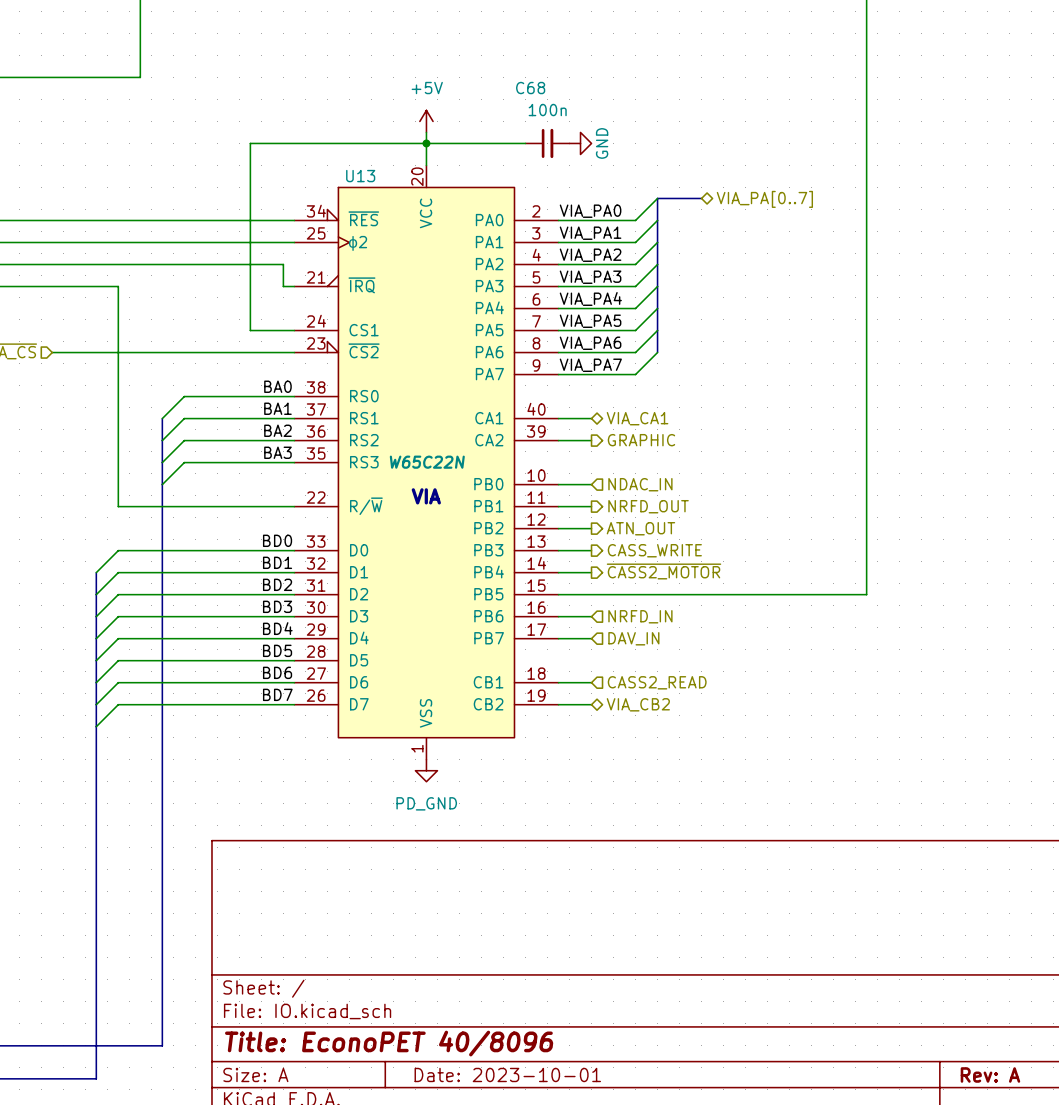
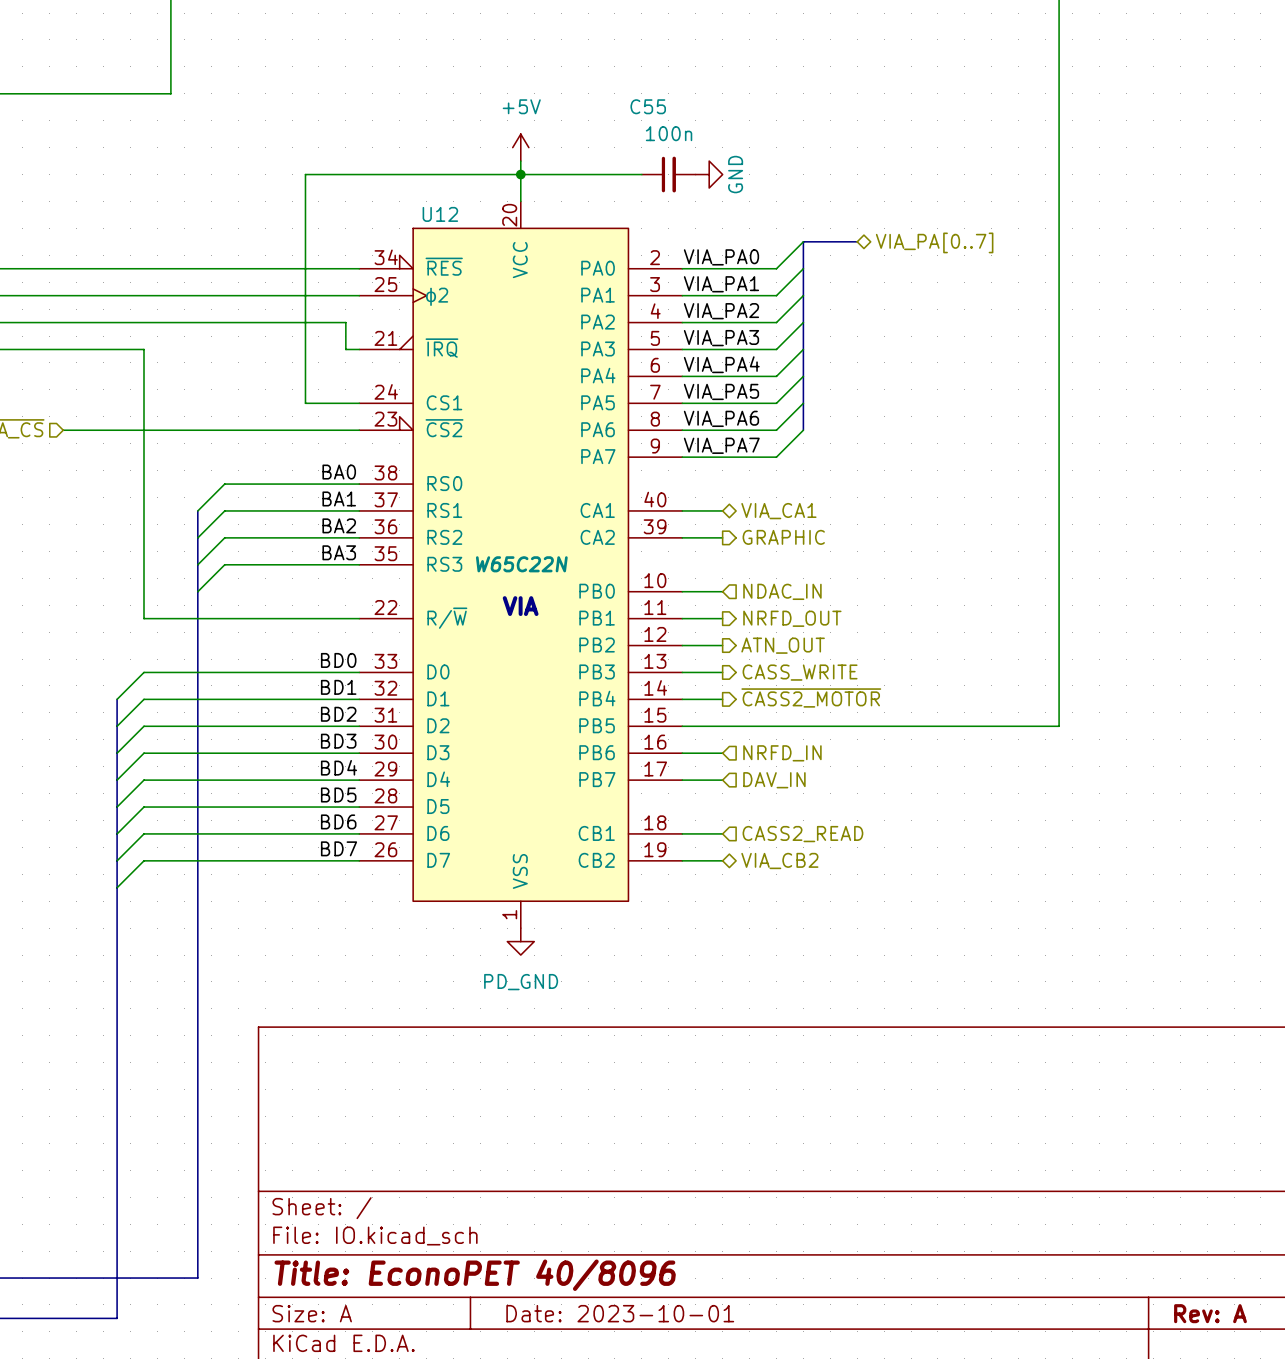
C68 name: C68 (530, 88) -> C55 (648, 106)
U13 name: U13 (360, 176) -> U12 (440, 214)

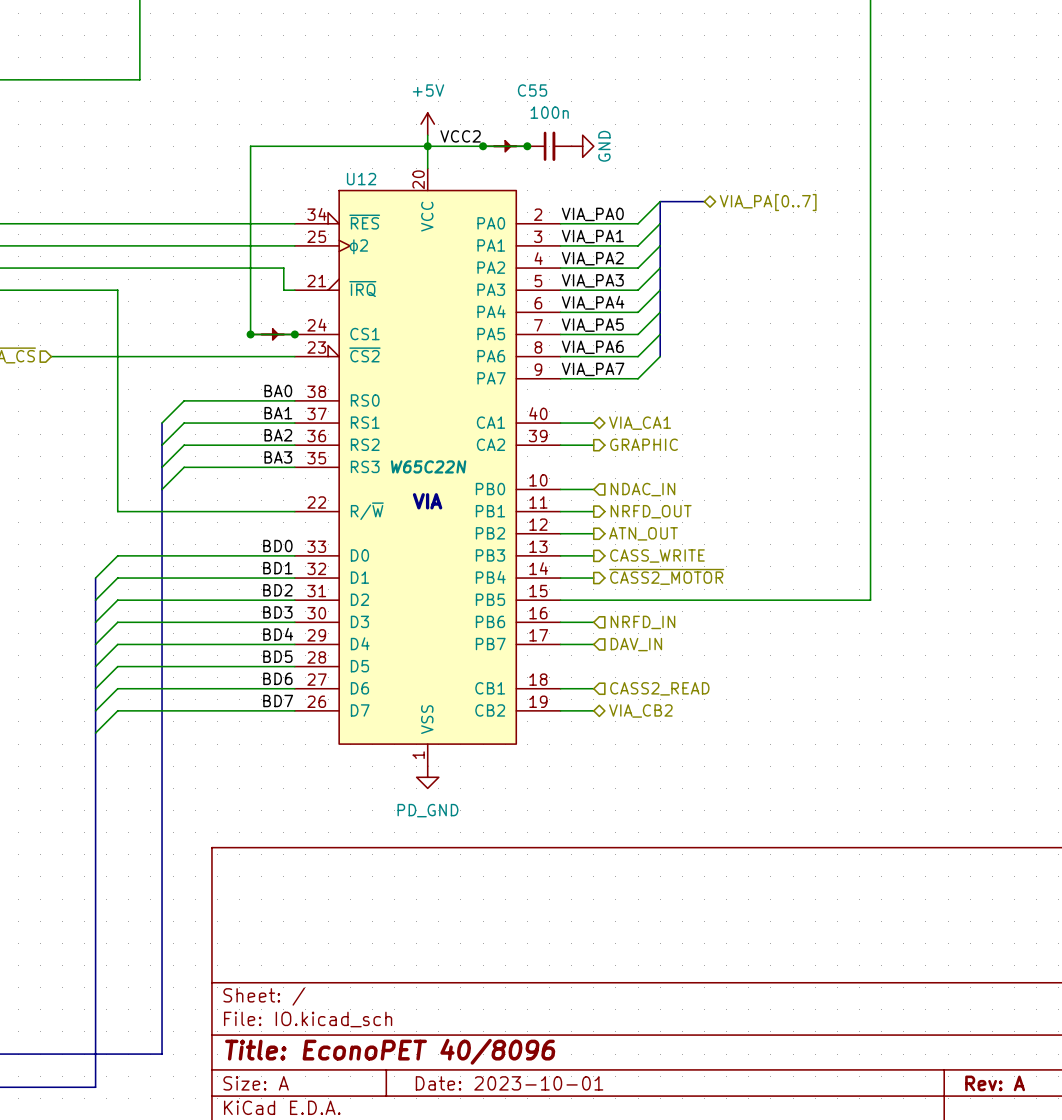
label: none -> VCC2 (460, 136)
junction: none -> (483, 146)
part: none -> (505, 146)
junction: none -> (527, 146)
junction: none -> (250, 334)
part: none -> (272, 334)
junction: none -> (294, 334)

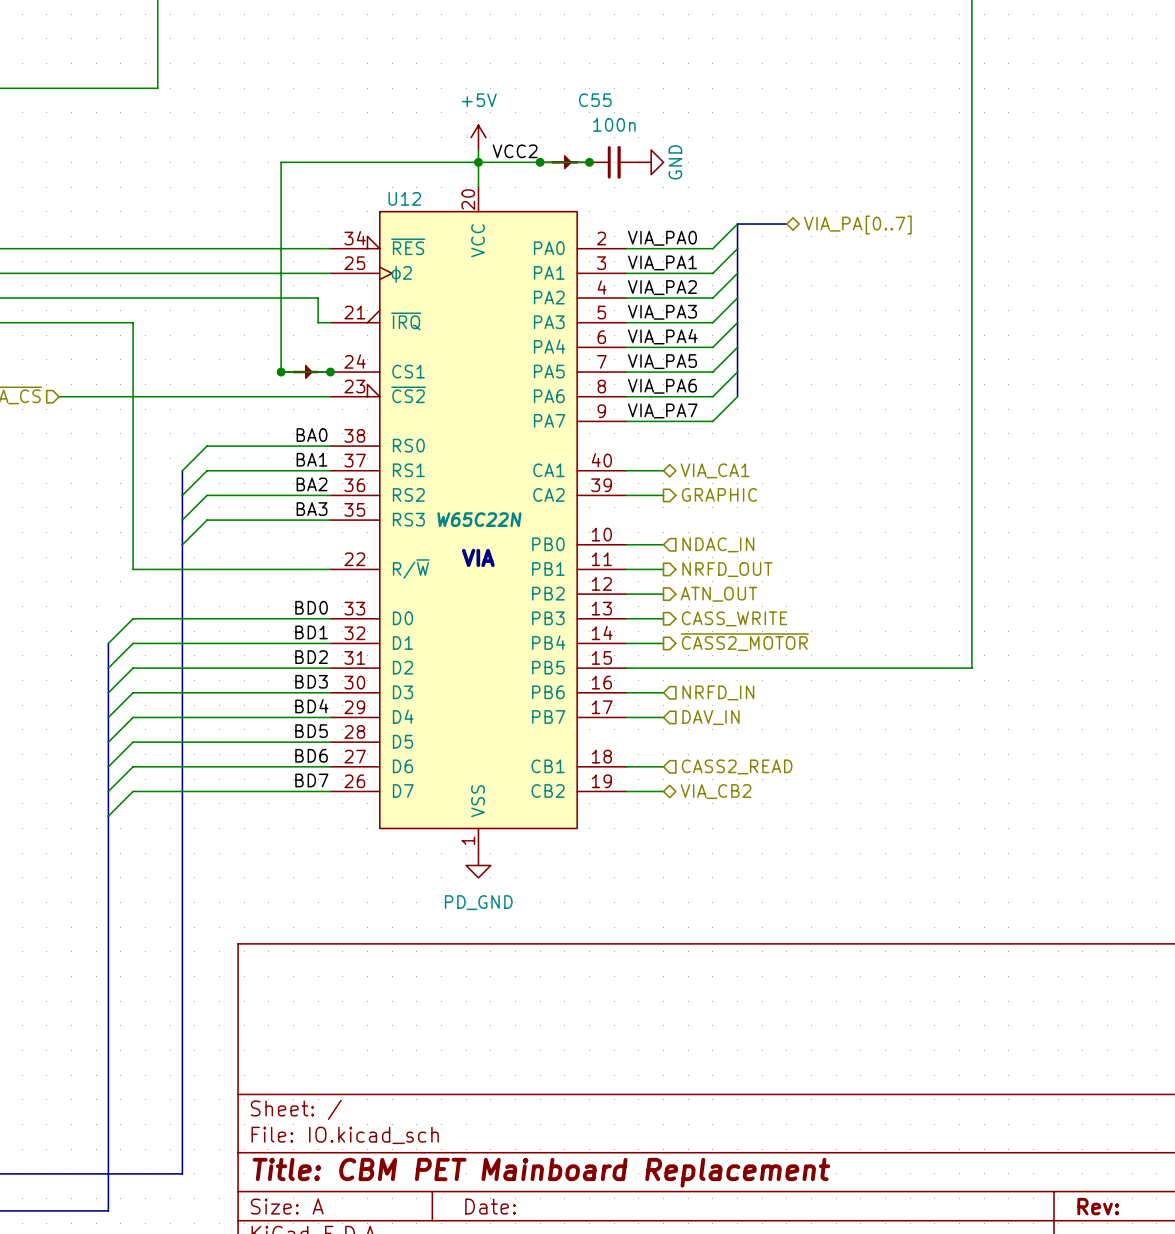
title block: Title: EconoPET 40/8096 (390, 1051) -> Title: CBM PET Mainboard Replacement (541, 1172)
title block: Date: 2023-10-01 (509, 1083) -> Date: (490, 1206)
title block: Rev: A (995, 1083) -> Rev: (1098, 1206)

